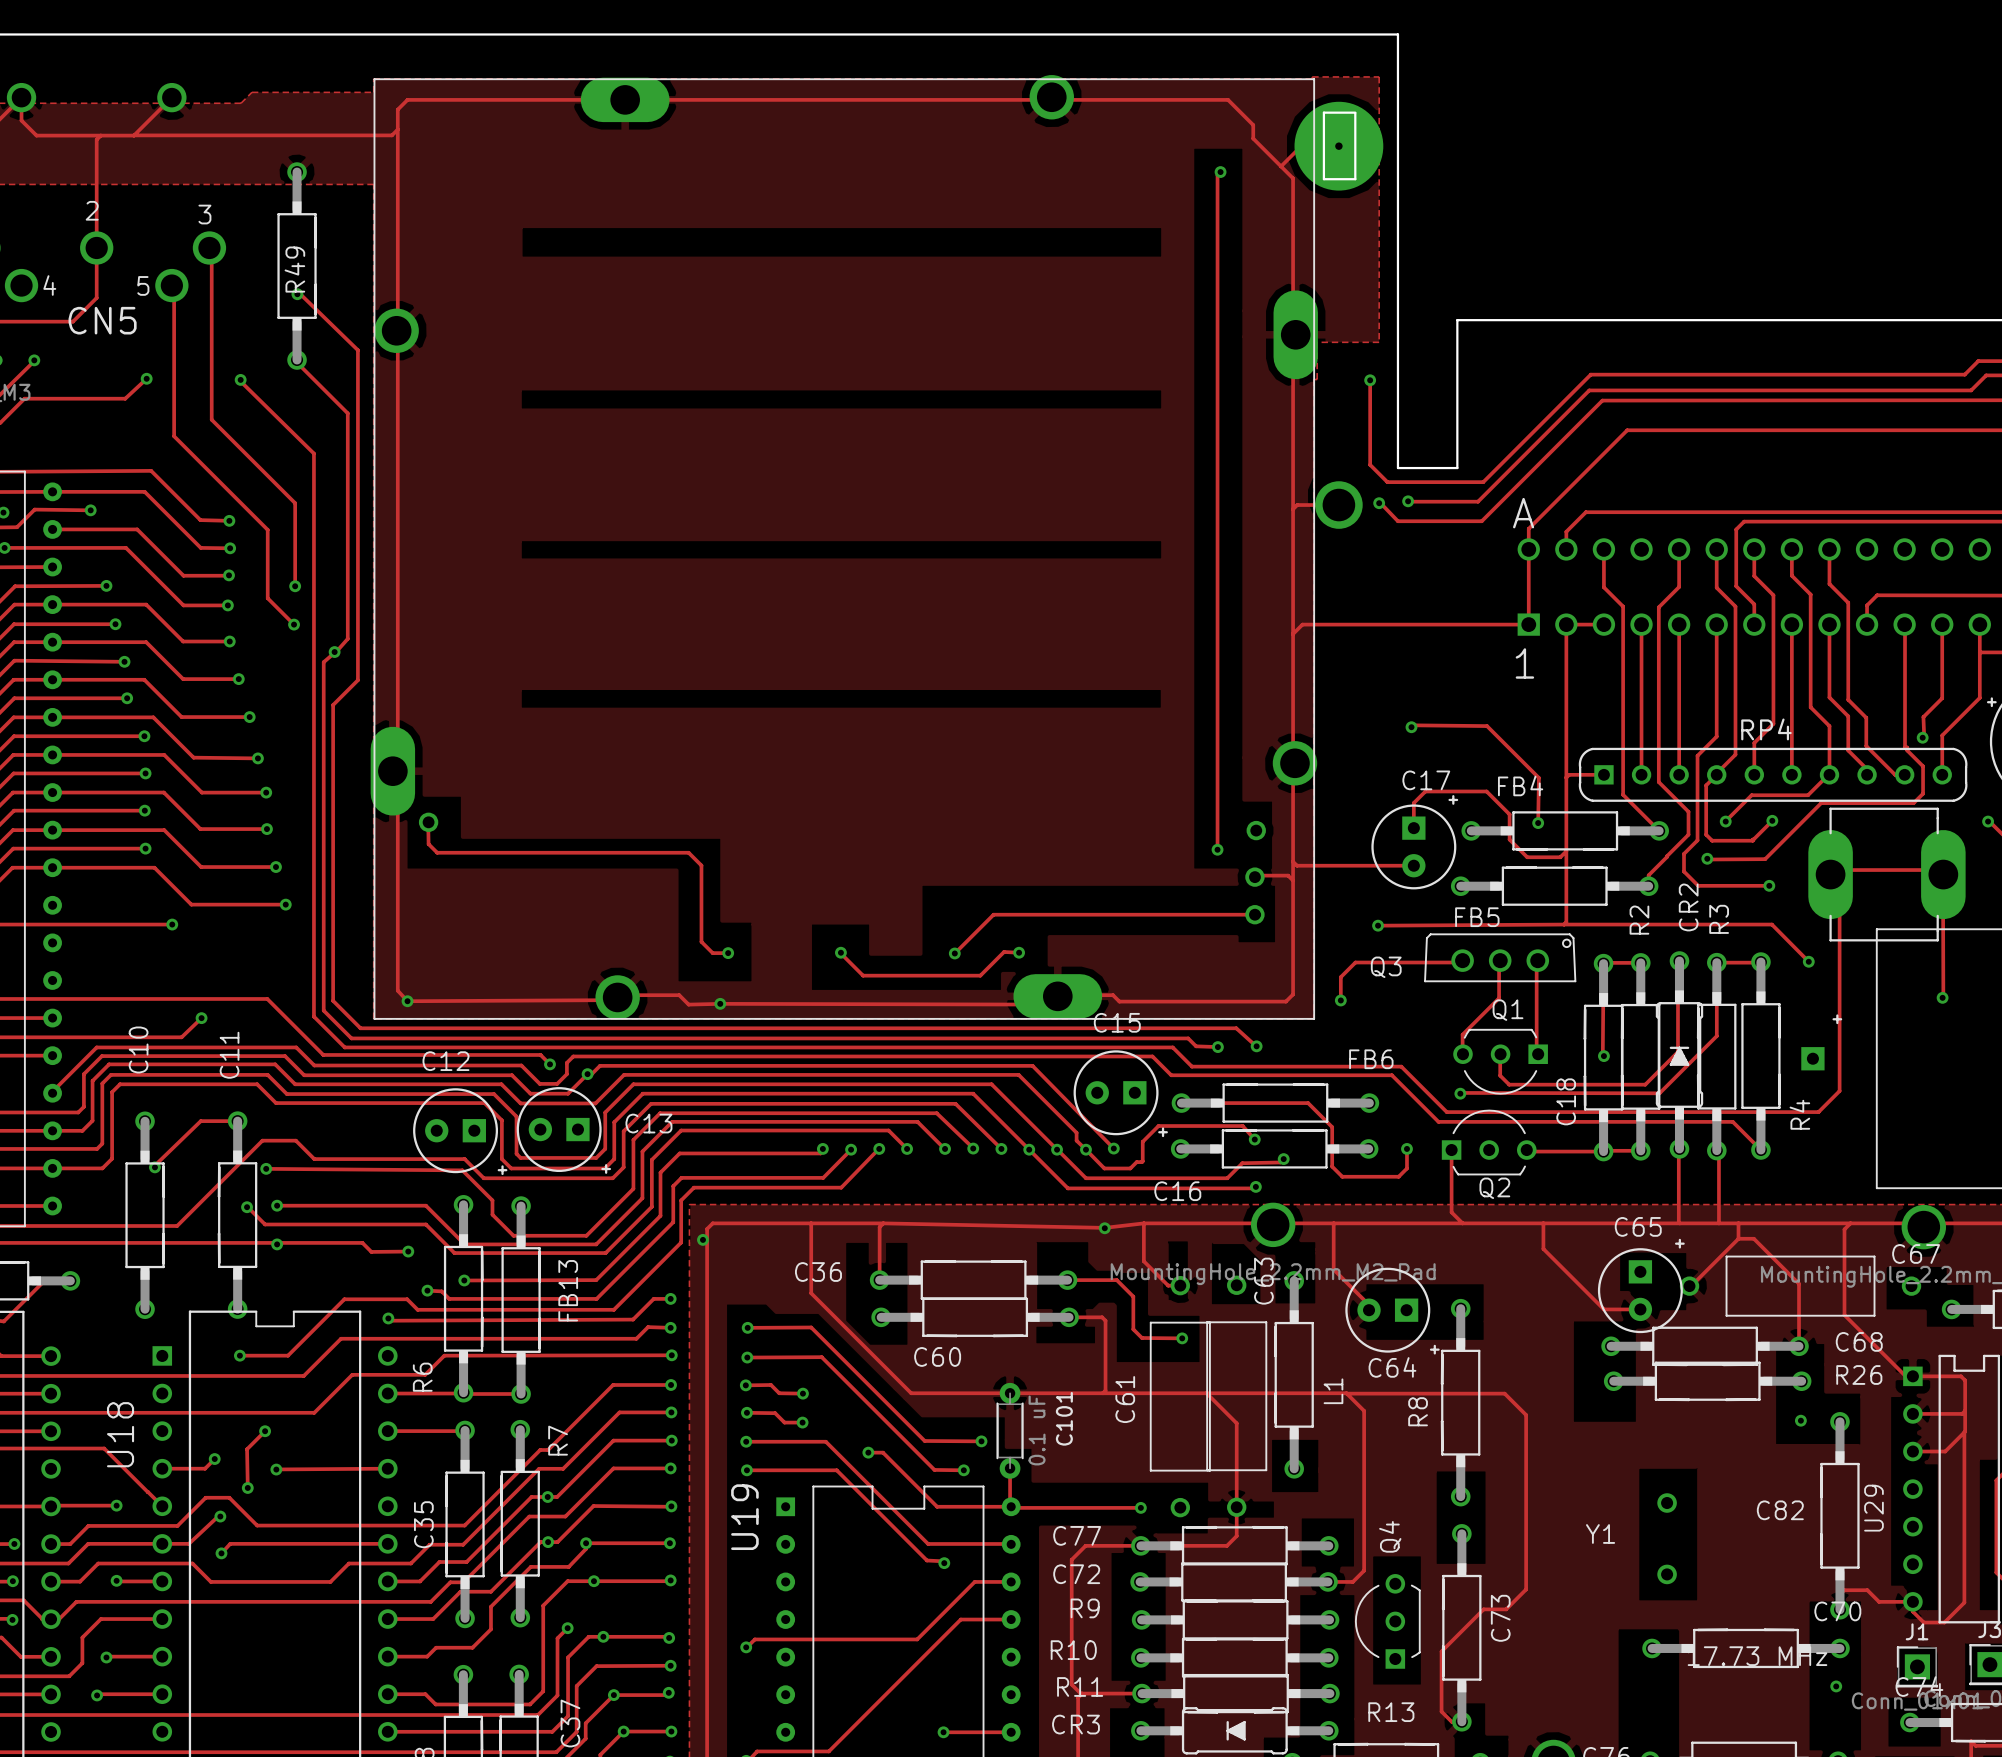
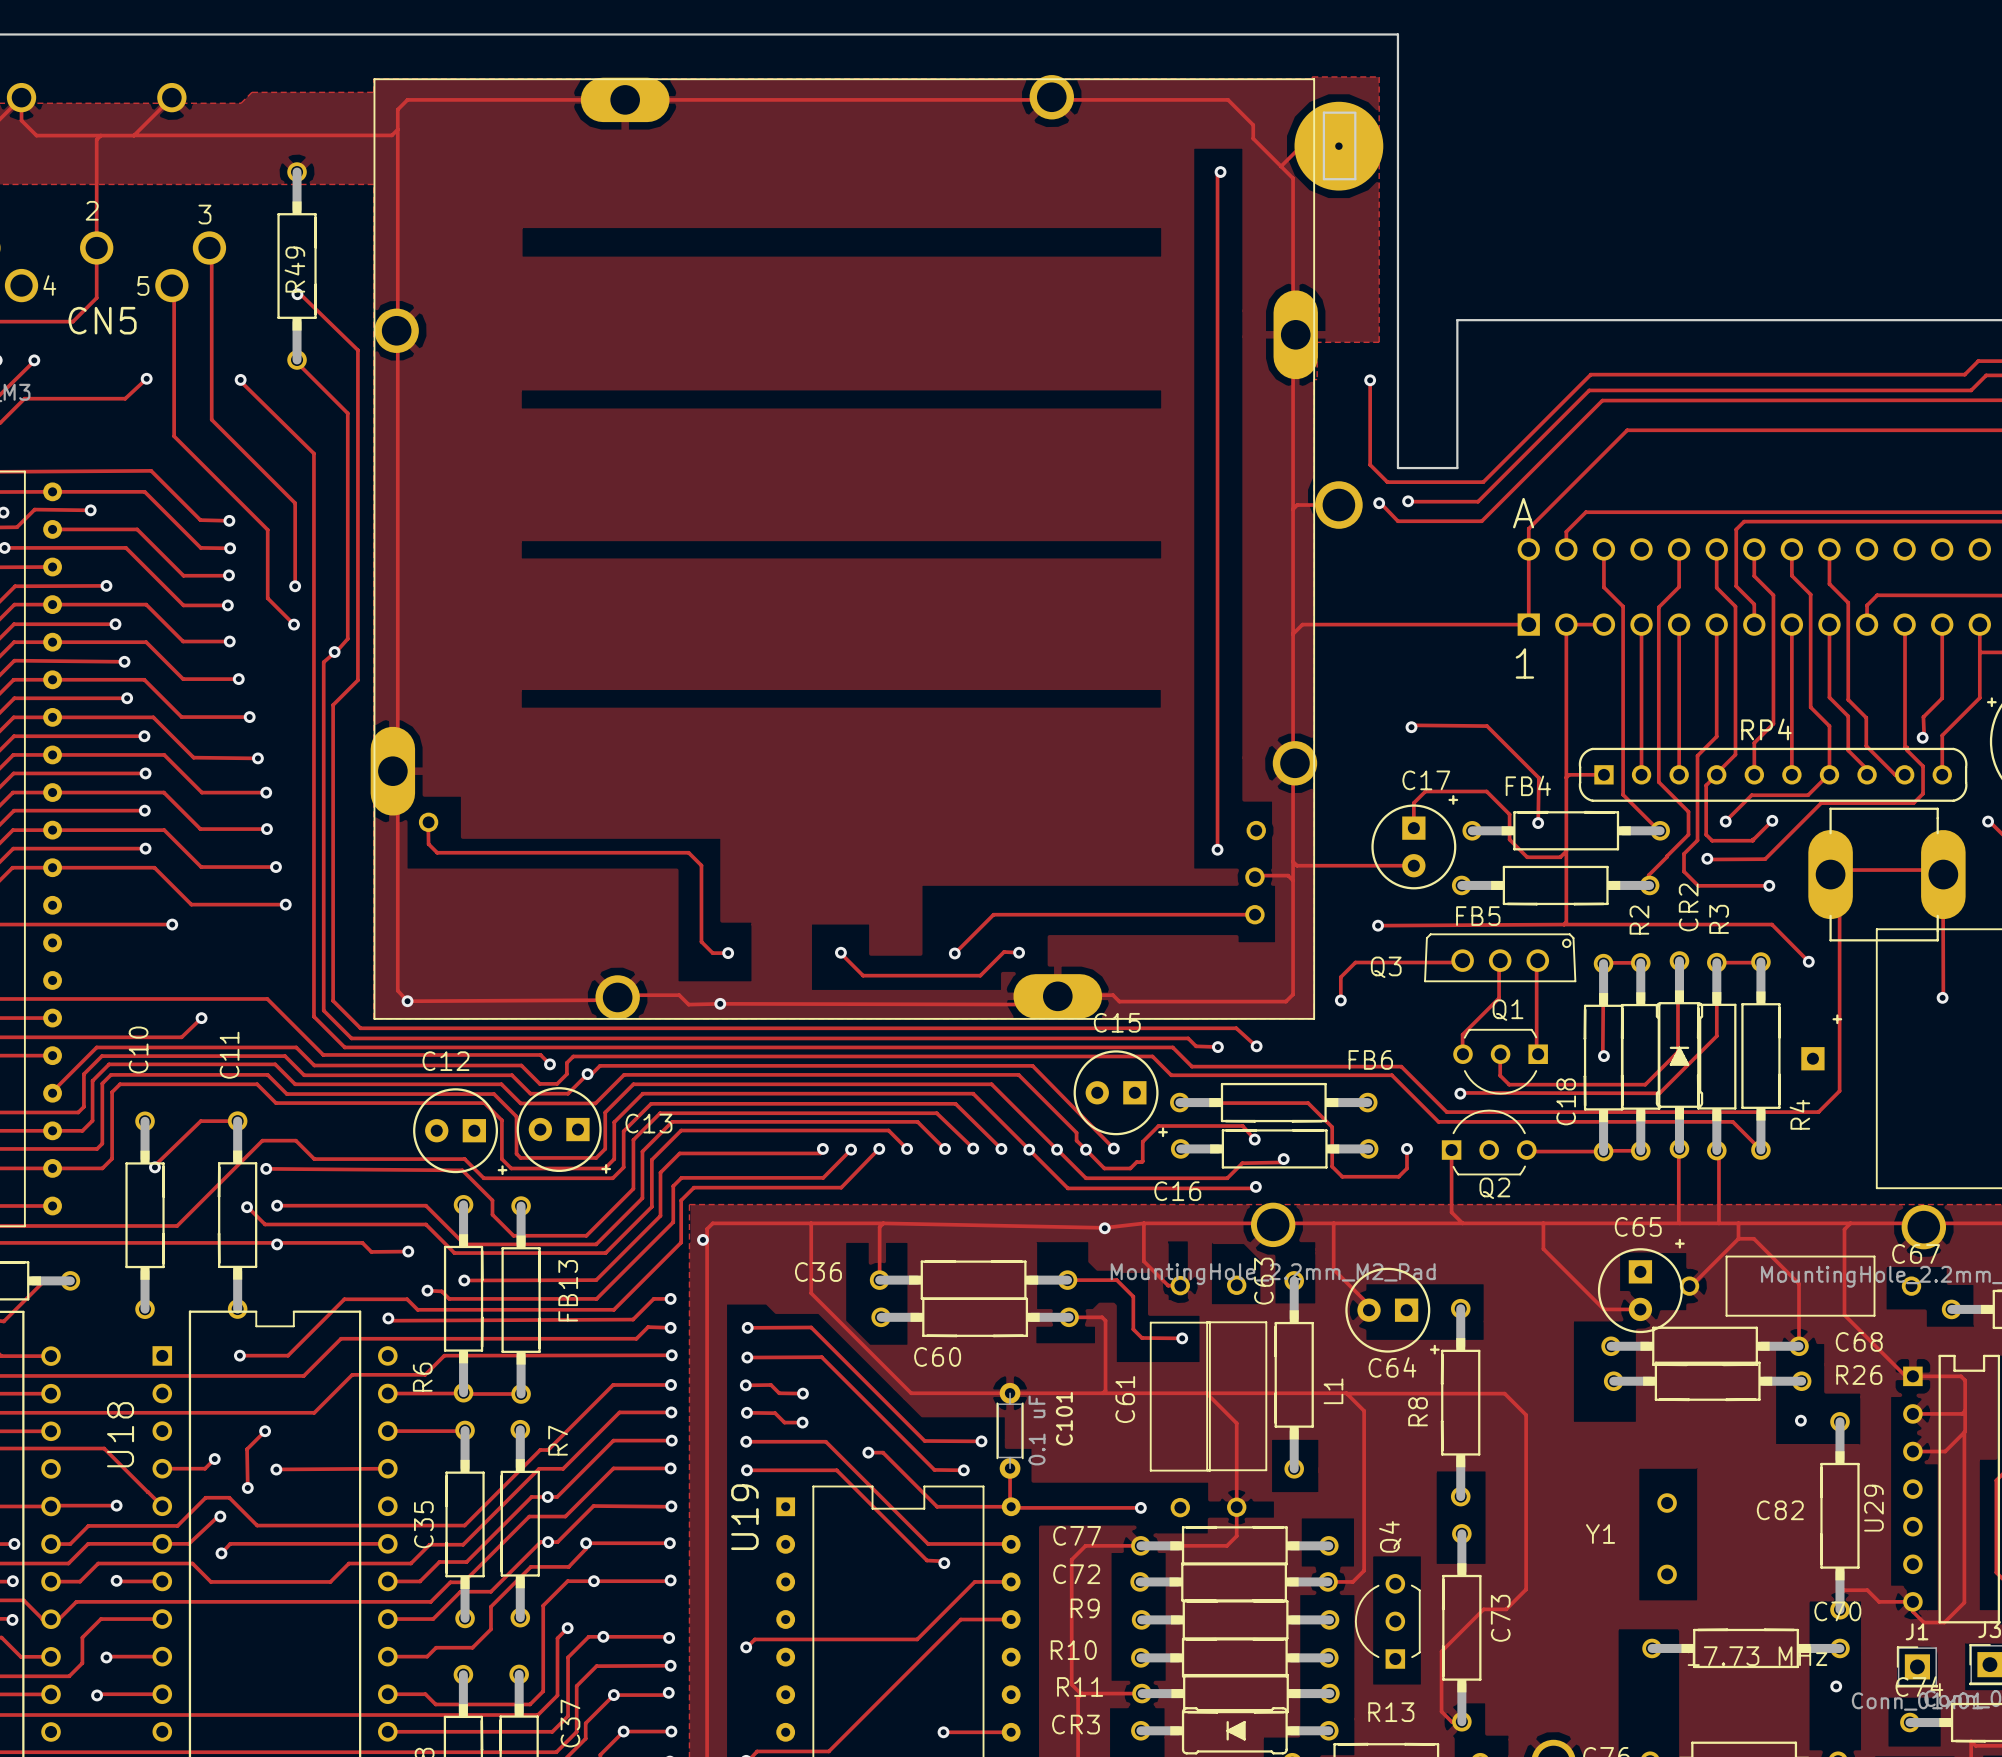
FB4 rotation: 0° (1565, 831) -> 180° (1566, 830)
FB5 rotation: 0° (1554, 886) -> 180° (1555, 885)
FB6 rotation: 0° (1275, 1102) -> 180° (1273, 1102)

